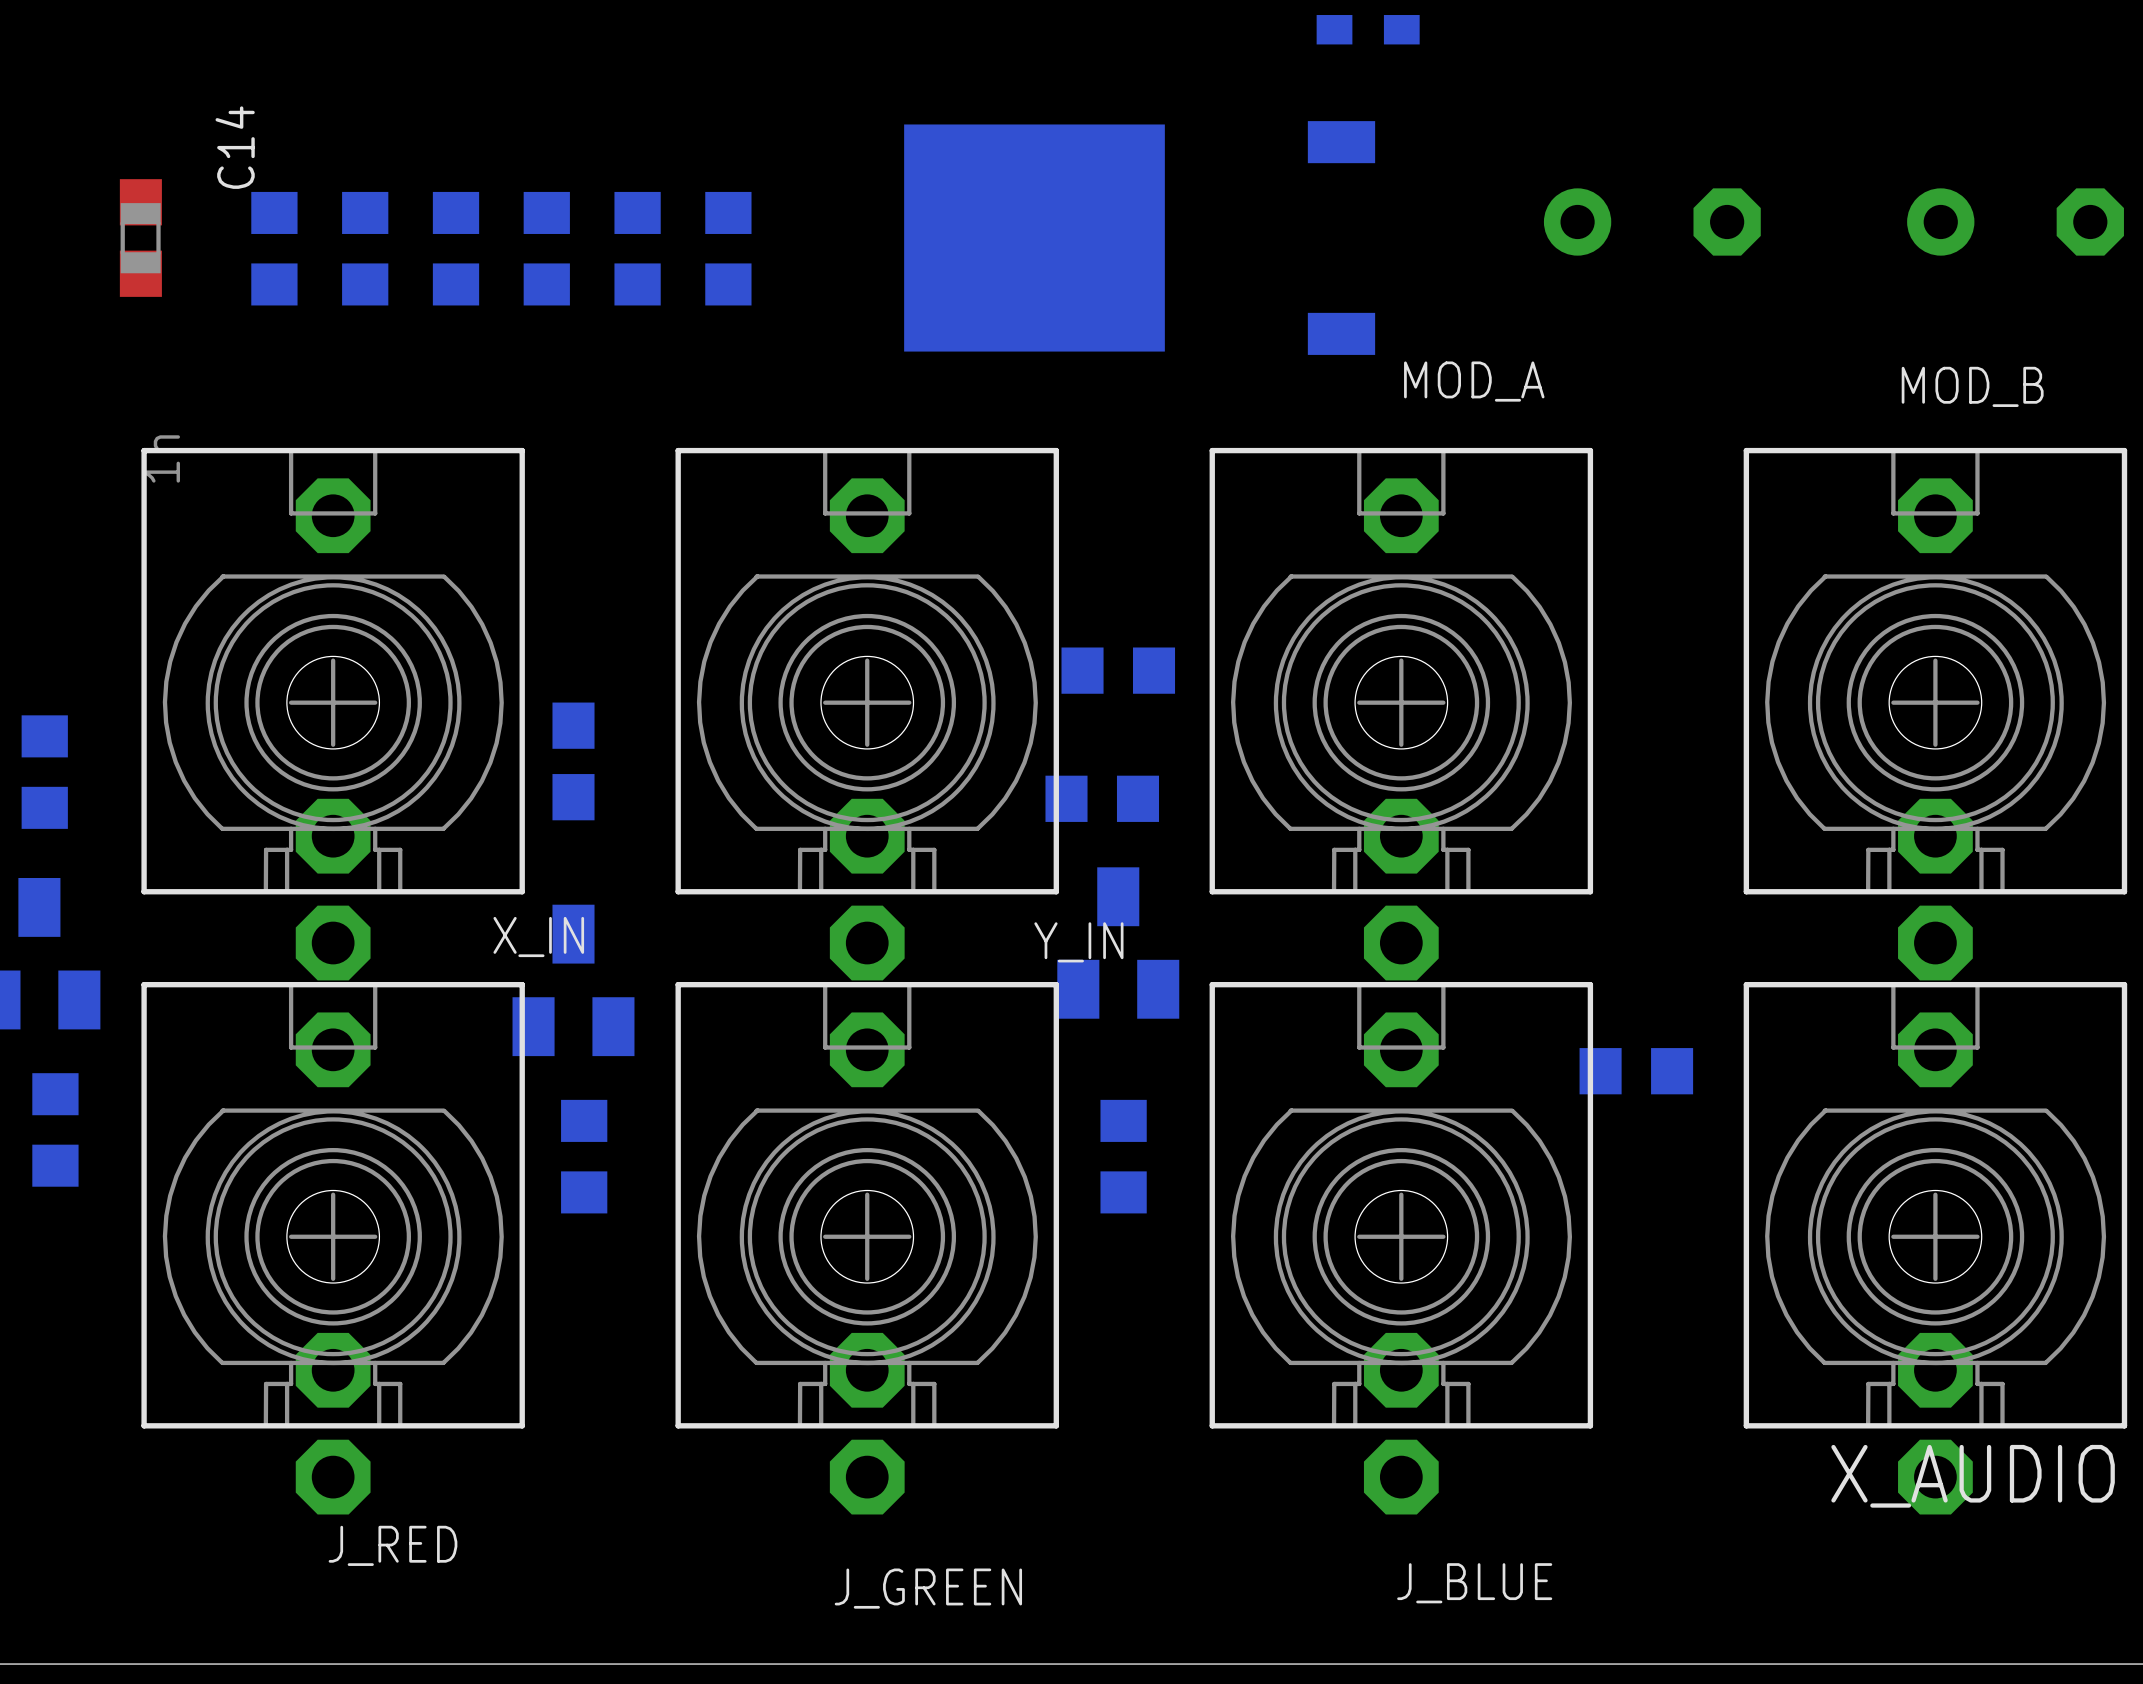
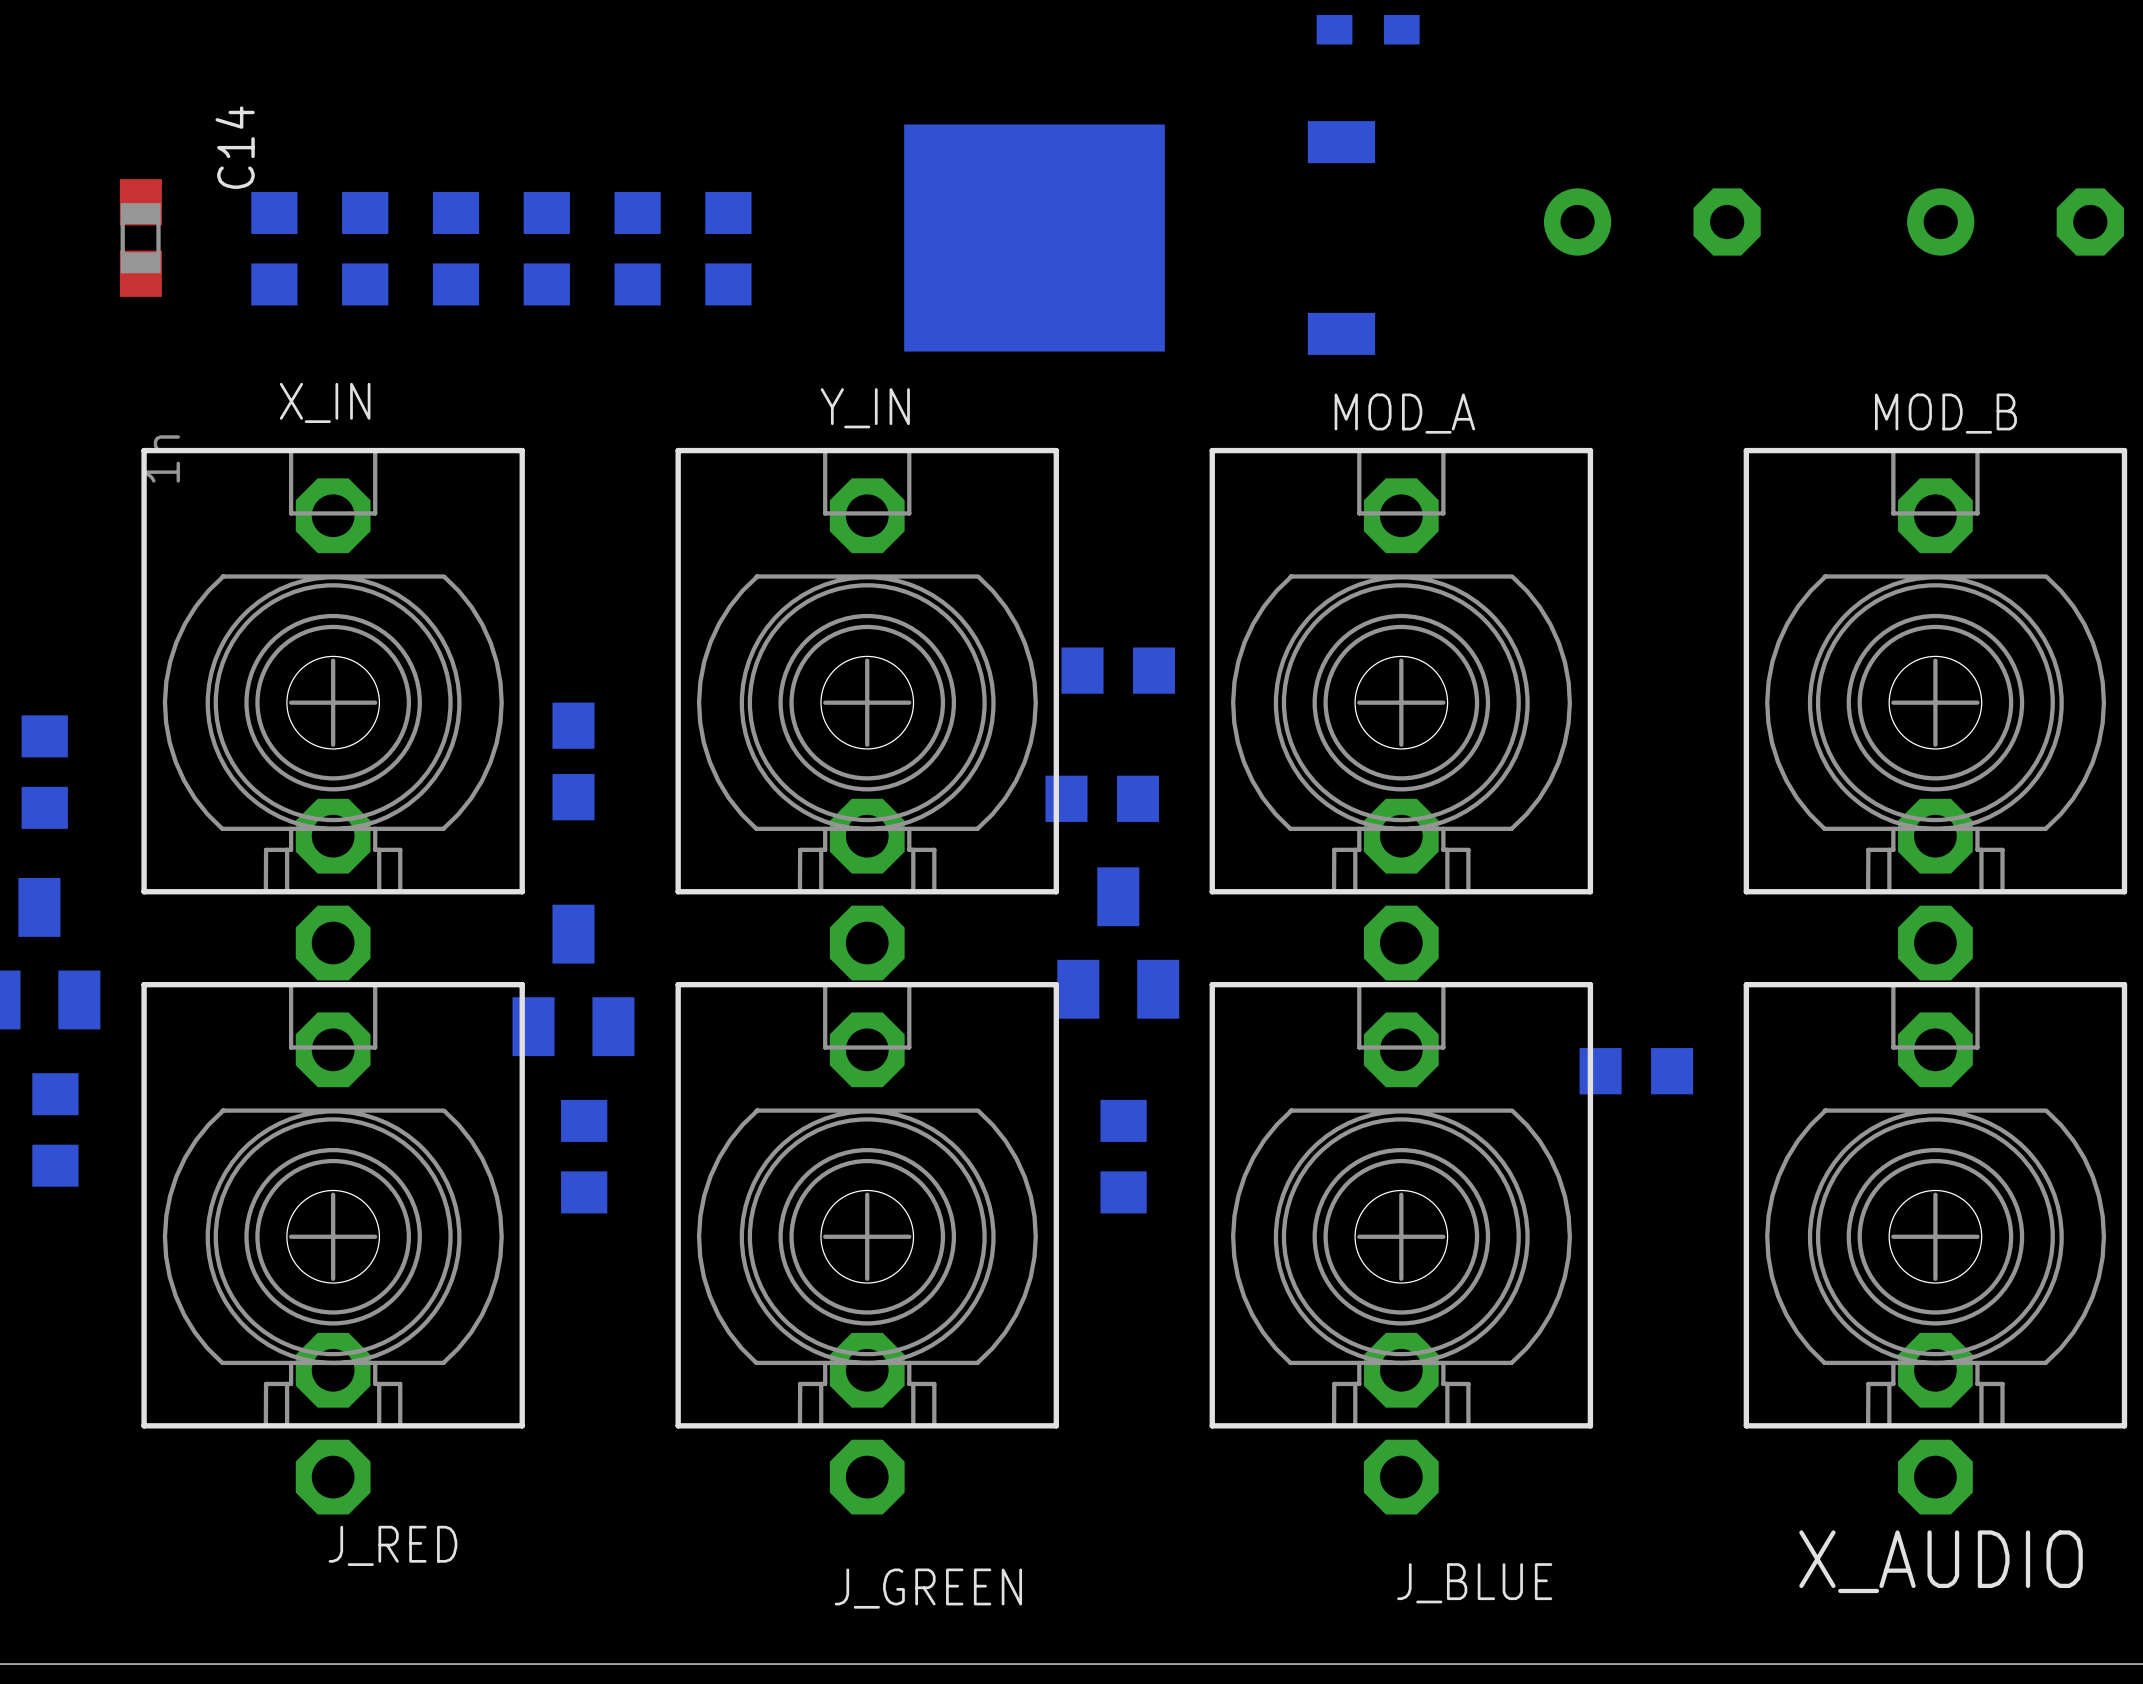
MOD_A name position: MOD_A (1474, 381) -> MOD_A (1404, 413)
MOD_B name position: MOD_B (1972, 386) -> MOD_B (1945, 413)
X_IN name position: X_IN (538, 937) -> X_IN (325, 402)
Y_IN name position: Y_IN (1078, 942) -> Y_IN (865, 408)
X_AUDIO name position: X_AUDIO (1973, 1476) -> X_AUDIO (1941, 1561)

